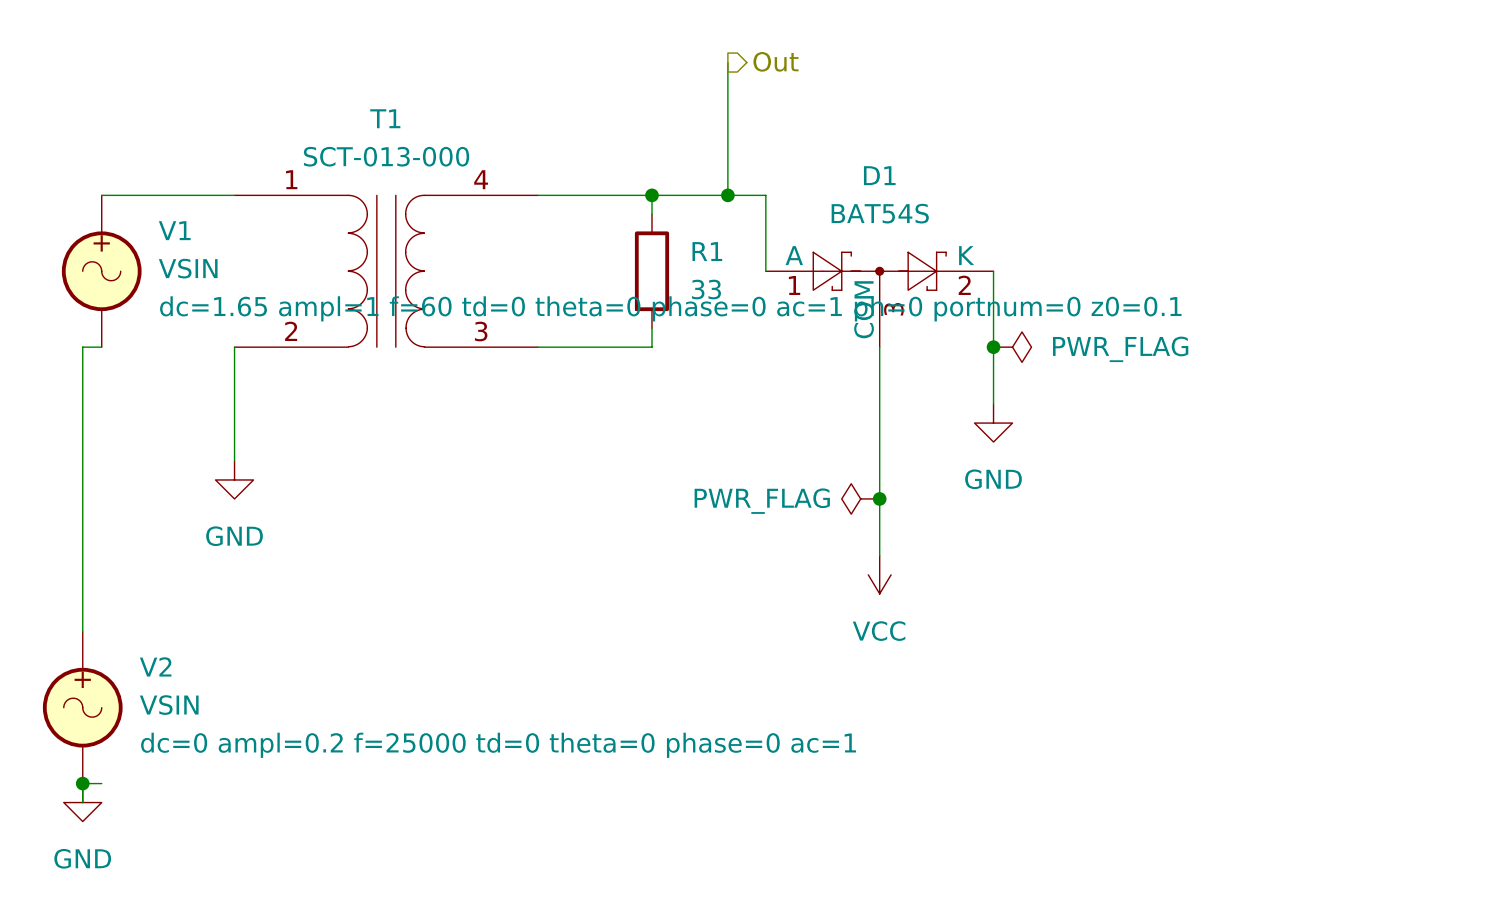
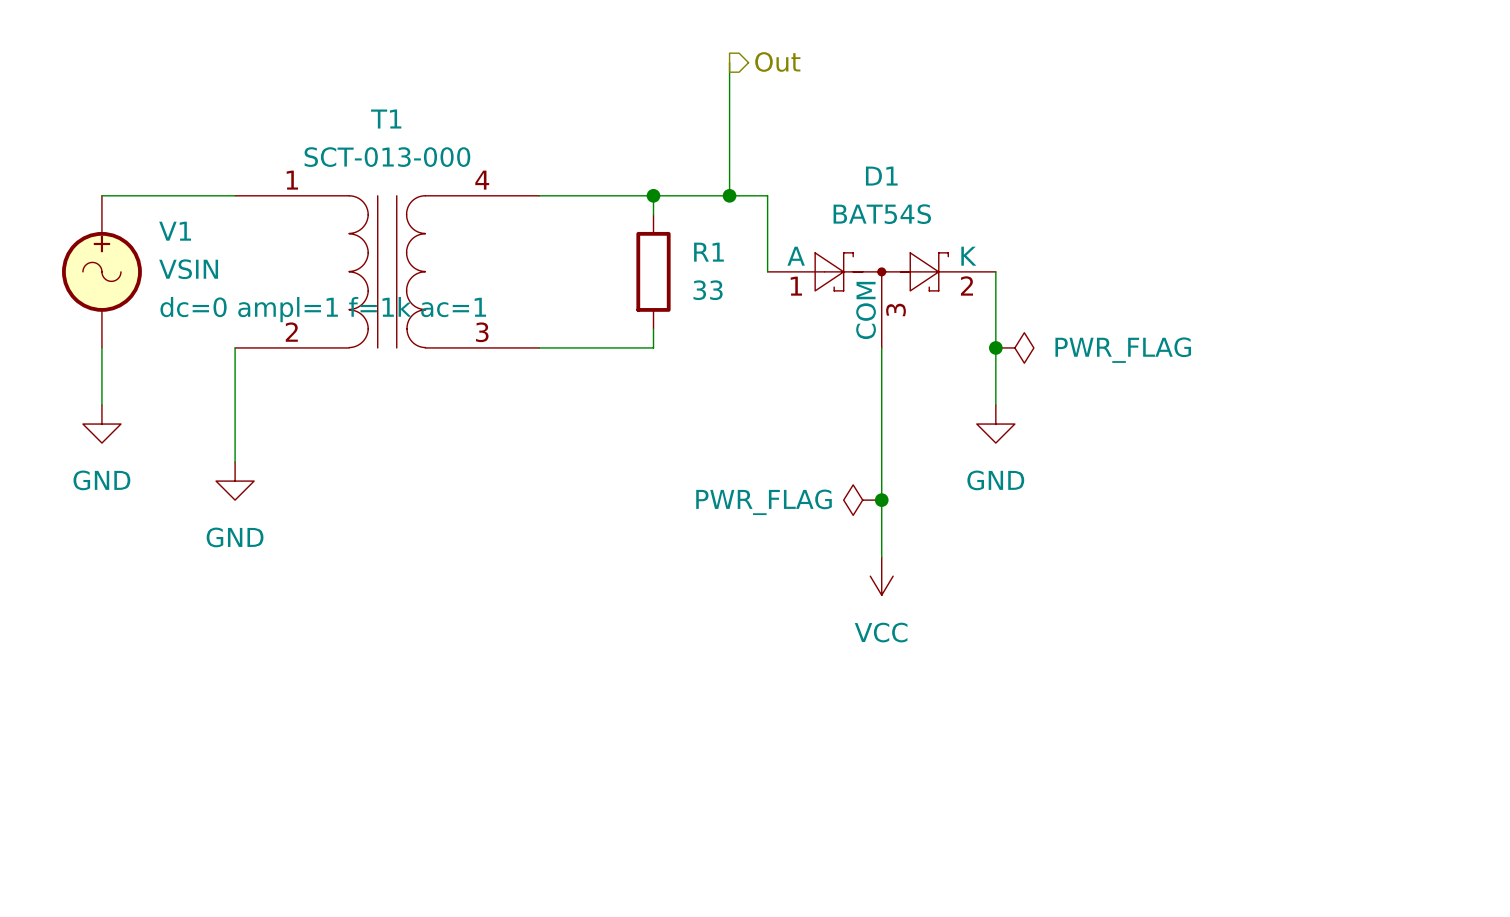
V1 text: dc=1.65 ampl=1 f=60 td=0 theta=0 phase=0 ac=1 ph=0 portnum=0 z0=0.1 (670, 308) -> dc=0 ampl=1 f=1k ac=1 (323, 309)
wire: (101, 347) (82, 347) (82, 631) -> (101, 347) (101, 405)
power symbol: none -> GND (101, 424)
V2: VSIN (82, 707) -> none
junction: (82, 783) -> none
wire: (101, 783) (82, 783) (82, 802) -> none
power symbol: GND (82, 802) -> none

